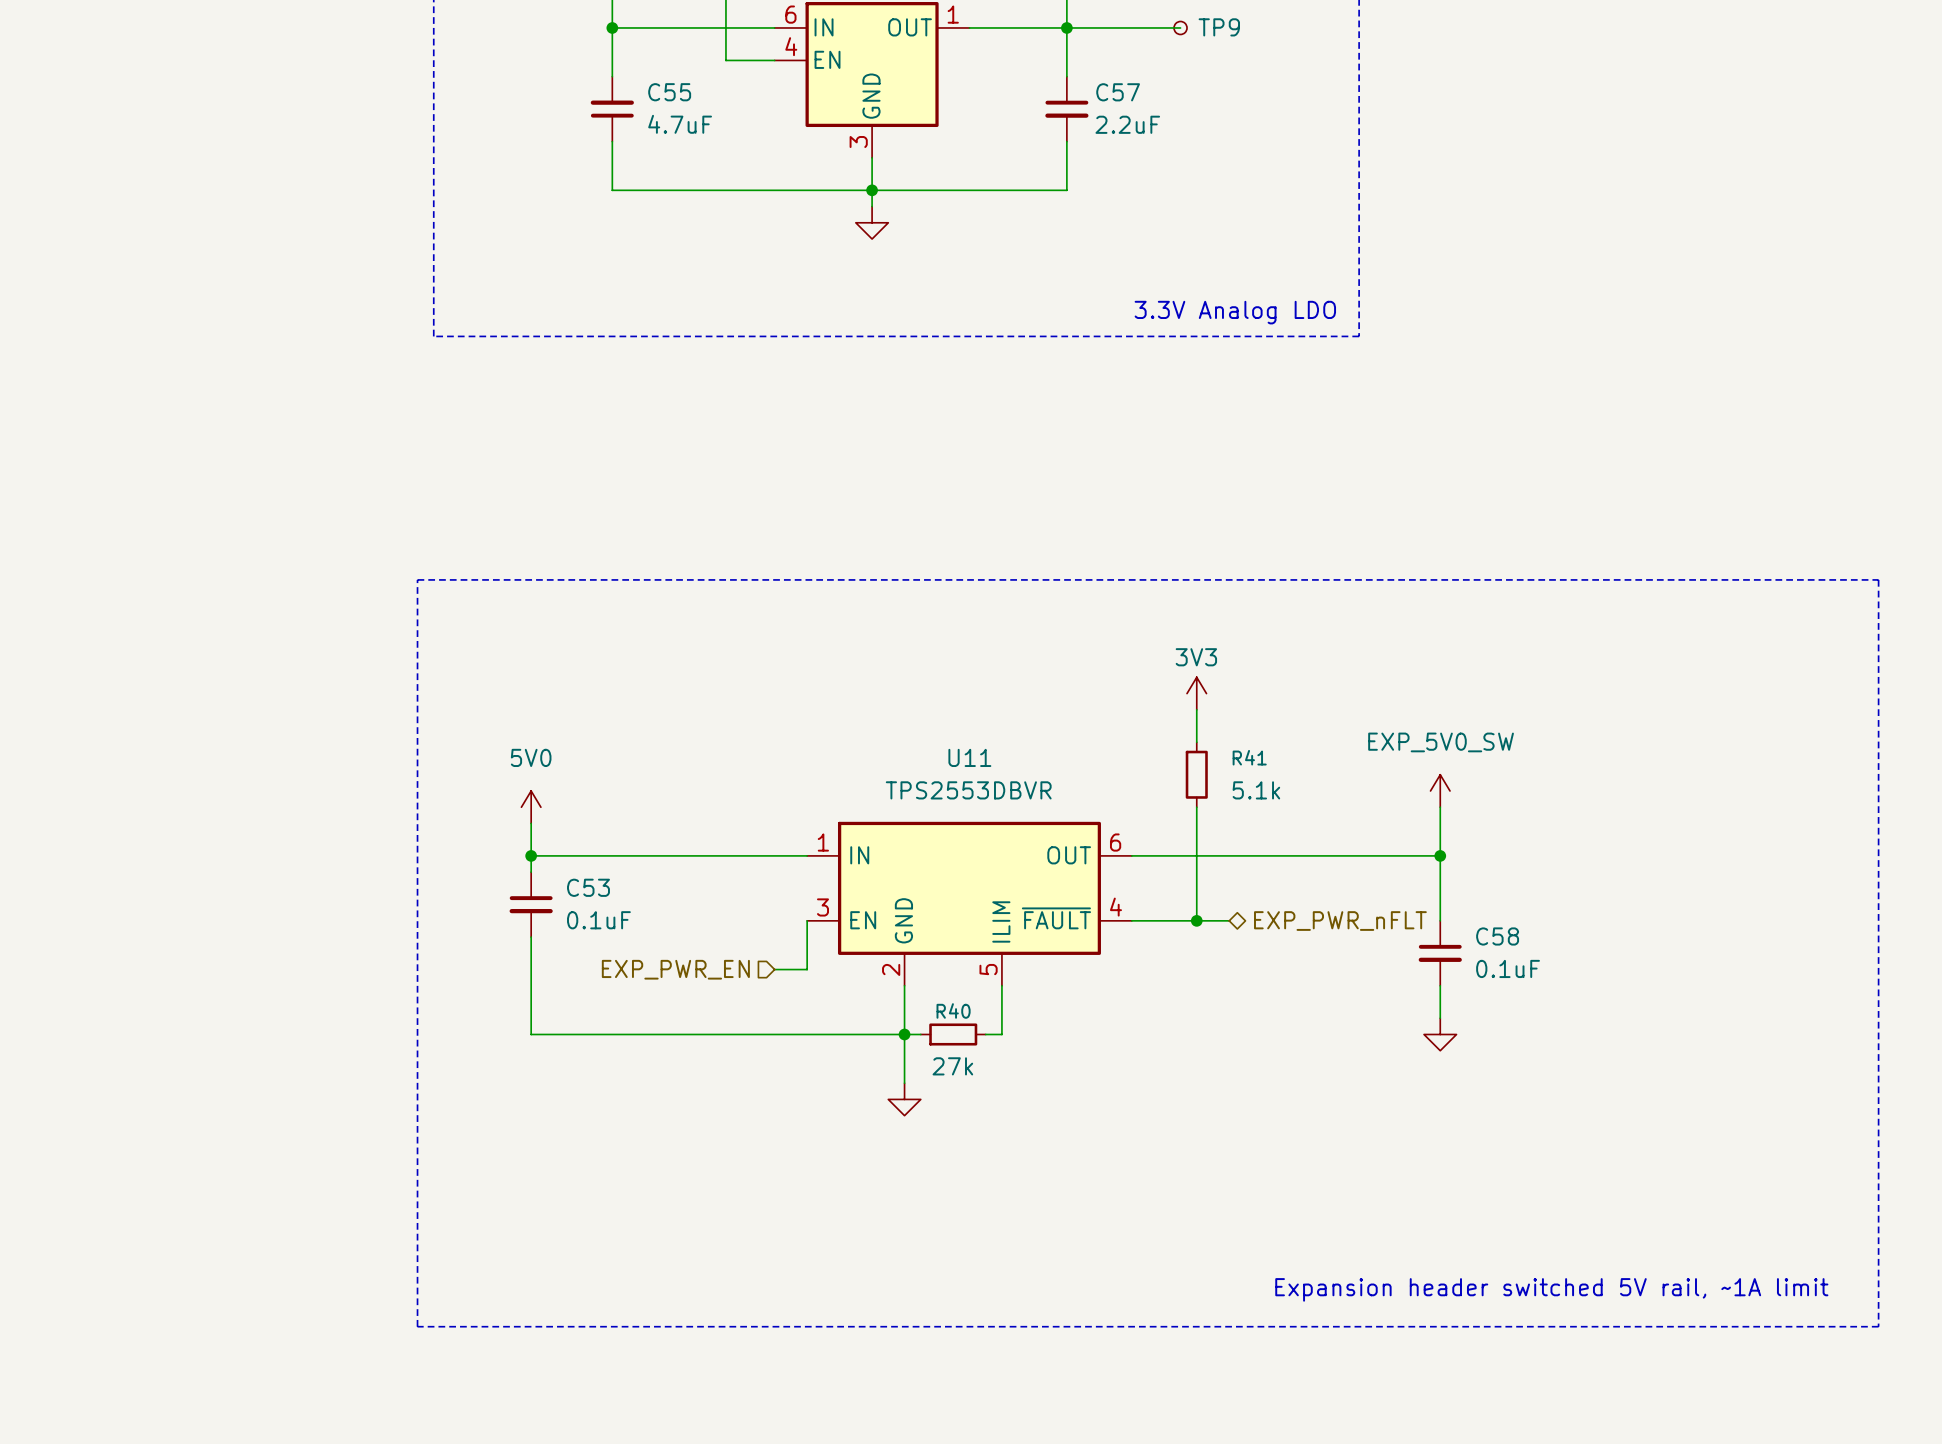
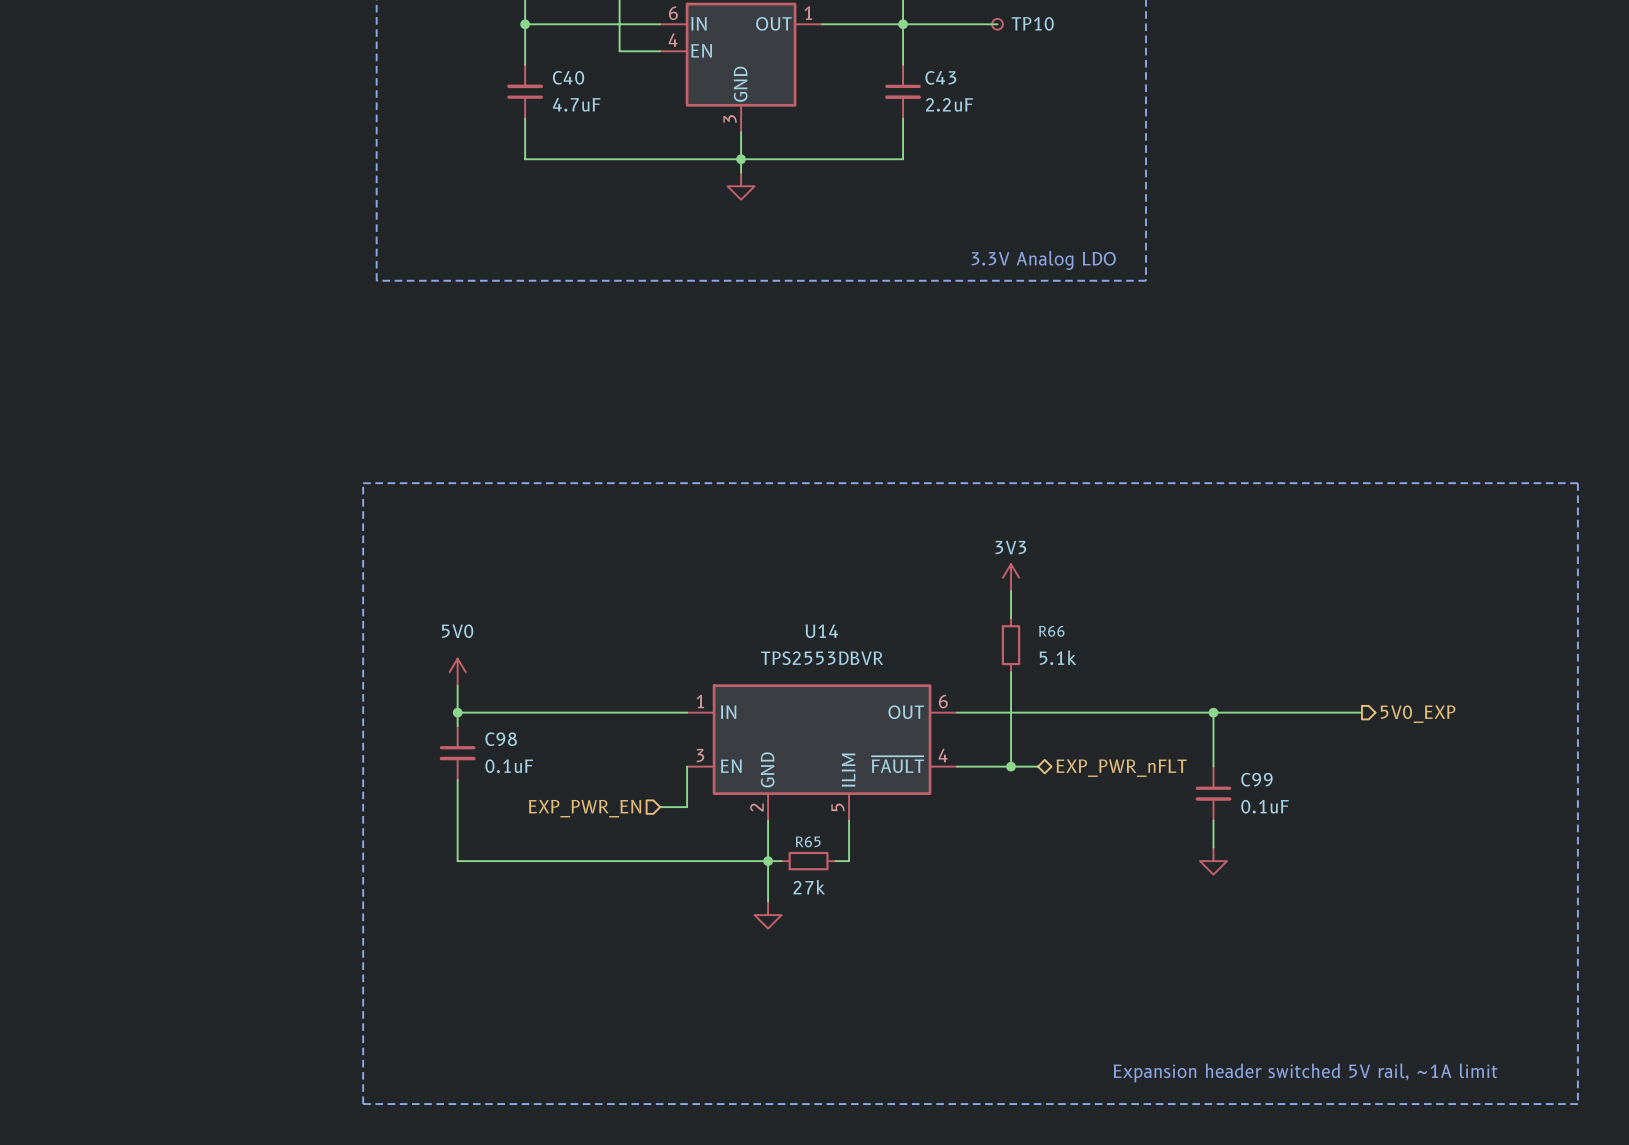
TP9 name: TP9 (1219, 27) -> TP10 (1032, 23)
C55 name: C55 (669, 92) -> C40 (568, 77)
C57 name: C57 (1118, 92) -> C43 (940, 77)
U11 name: U11 (969, 757) -> U14 (821, 631)
R41 name: R41 (1249, 757) -> R66 (1051, 631)
power symbol: EXP_5V0_SW (1440, 790) -> none
wire: (1440, 807) (1440, 855) -> (1361, 712) (1213, 712)
hierarchical label: none -> 5V0_EXP (1418, 714)
C53 name: C53 (588, 887) -> C98 (501, 739)
C58 name: C58 (1497, 936) -> C99 (1256, 779)
R40 name: R40 (953, 1010) -> R65 (808, 841)

